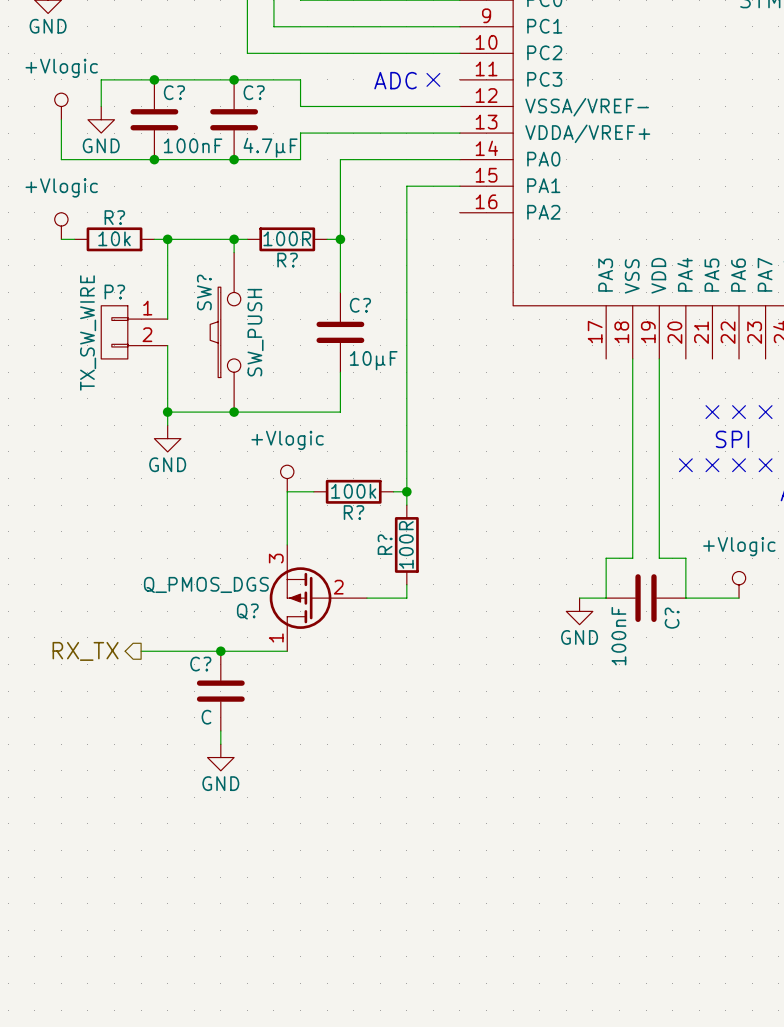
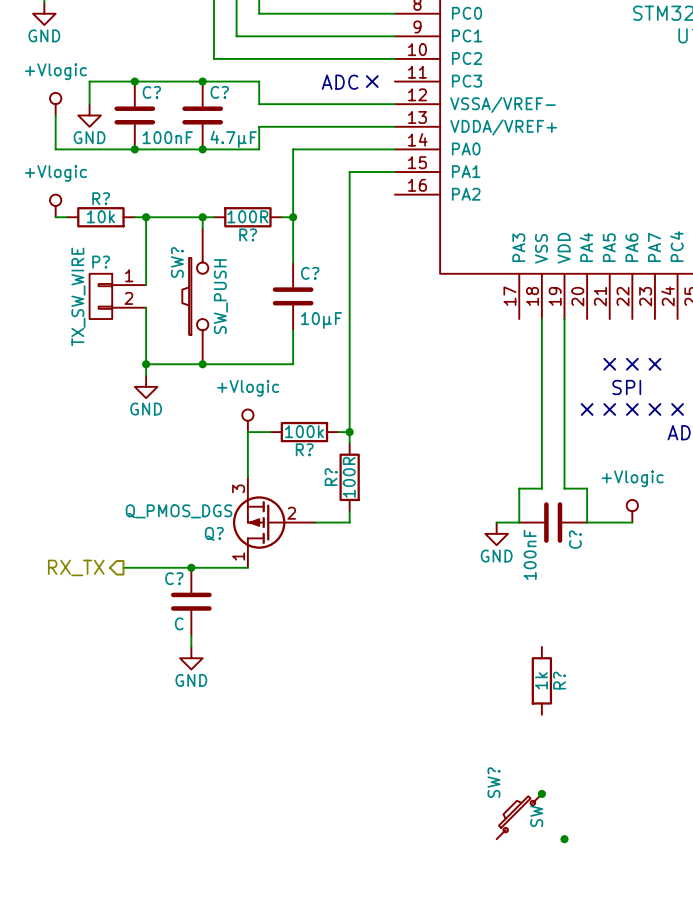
R?: none -> 1k (541, 680)
junction: none -> (541, 793)
SW?: none -> SW (519, 816)
junction: none -> (564, 839)

